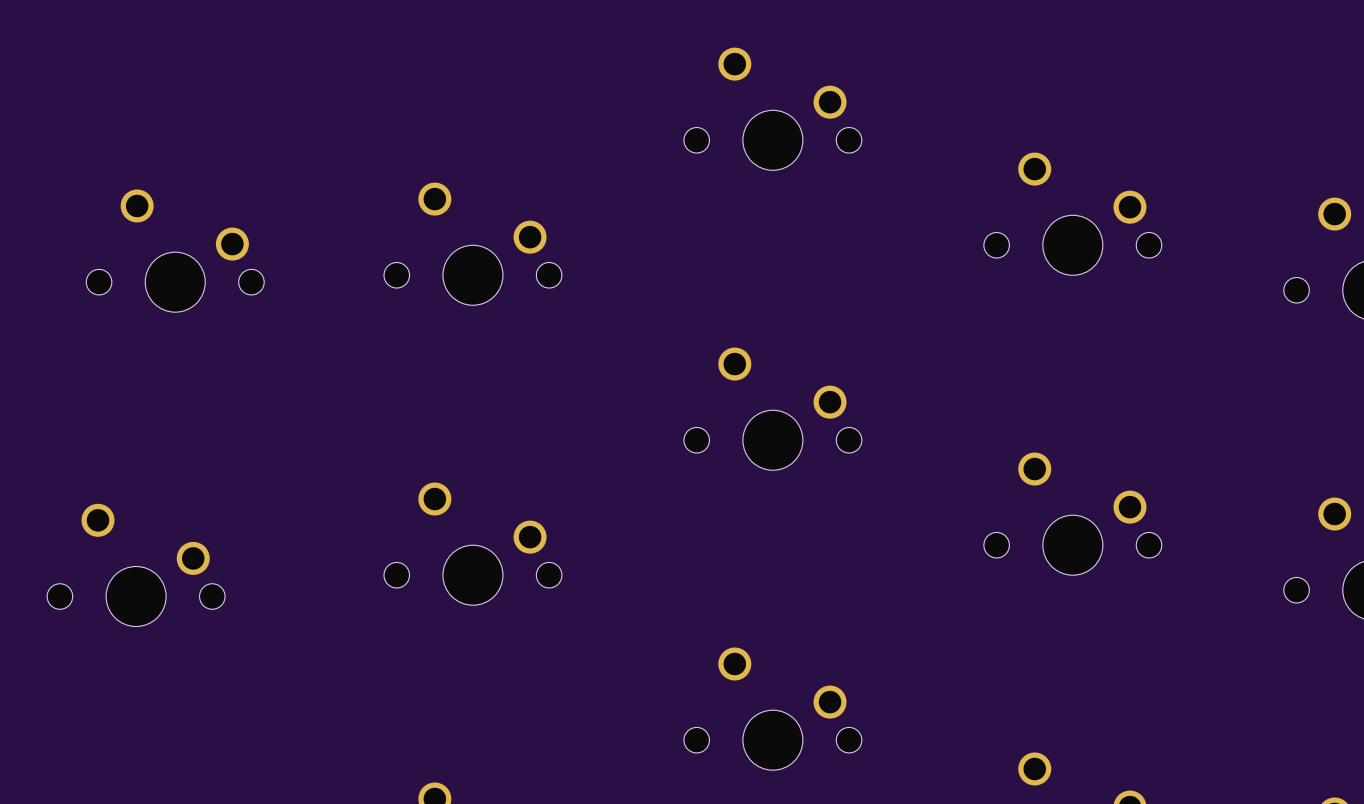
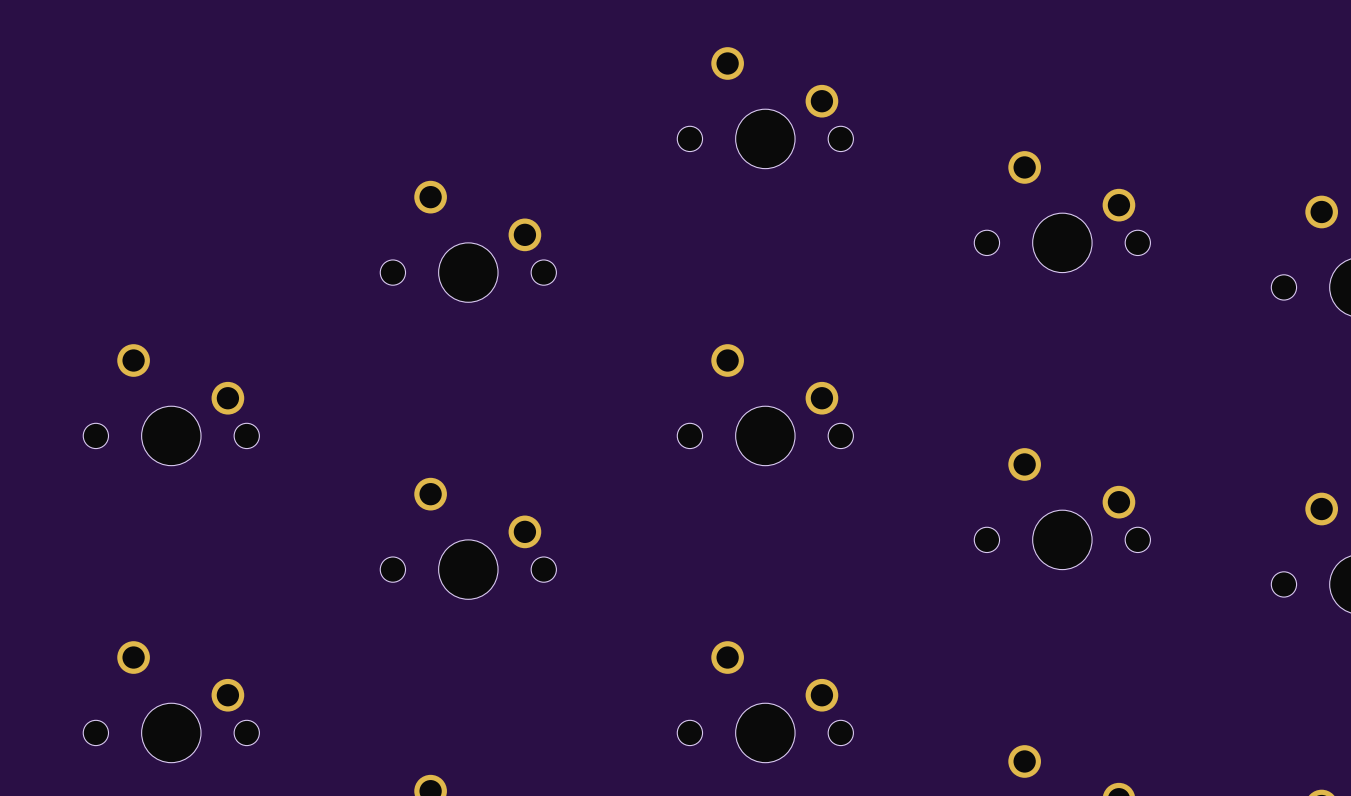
part: (175, 250) -> none
part: none -> (171, 404)
part: (136, 565) -> none
part: none -> (171, 701)

